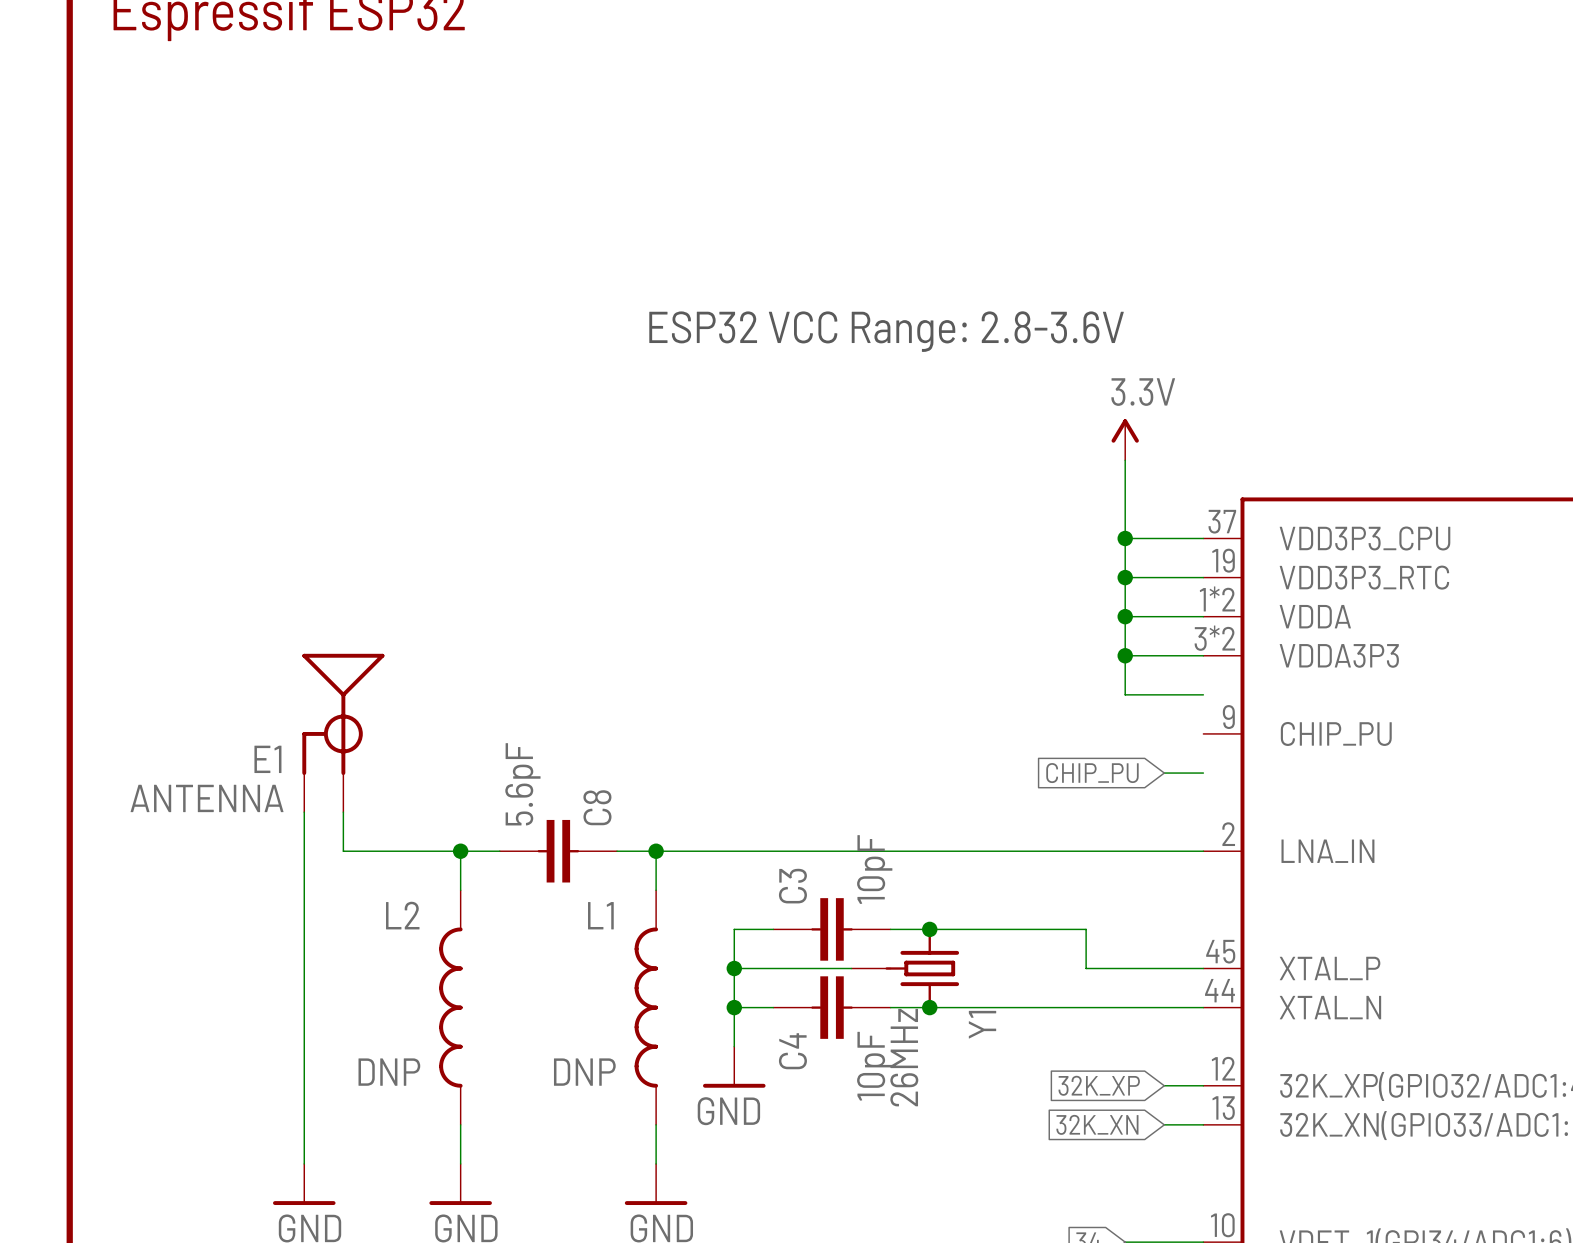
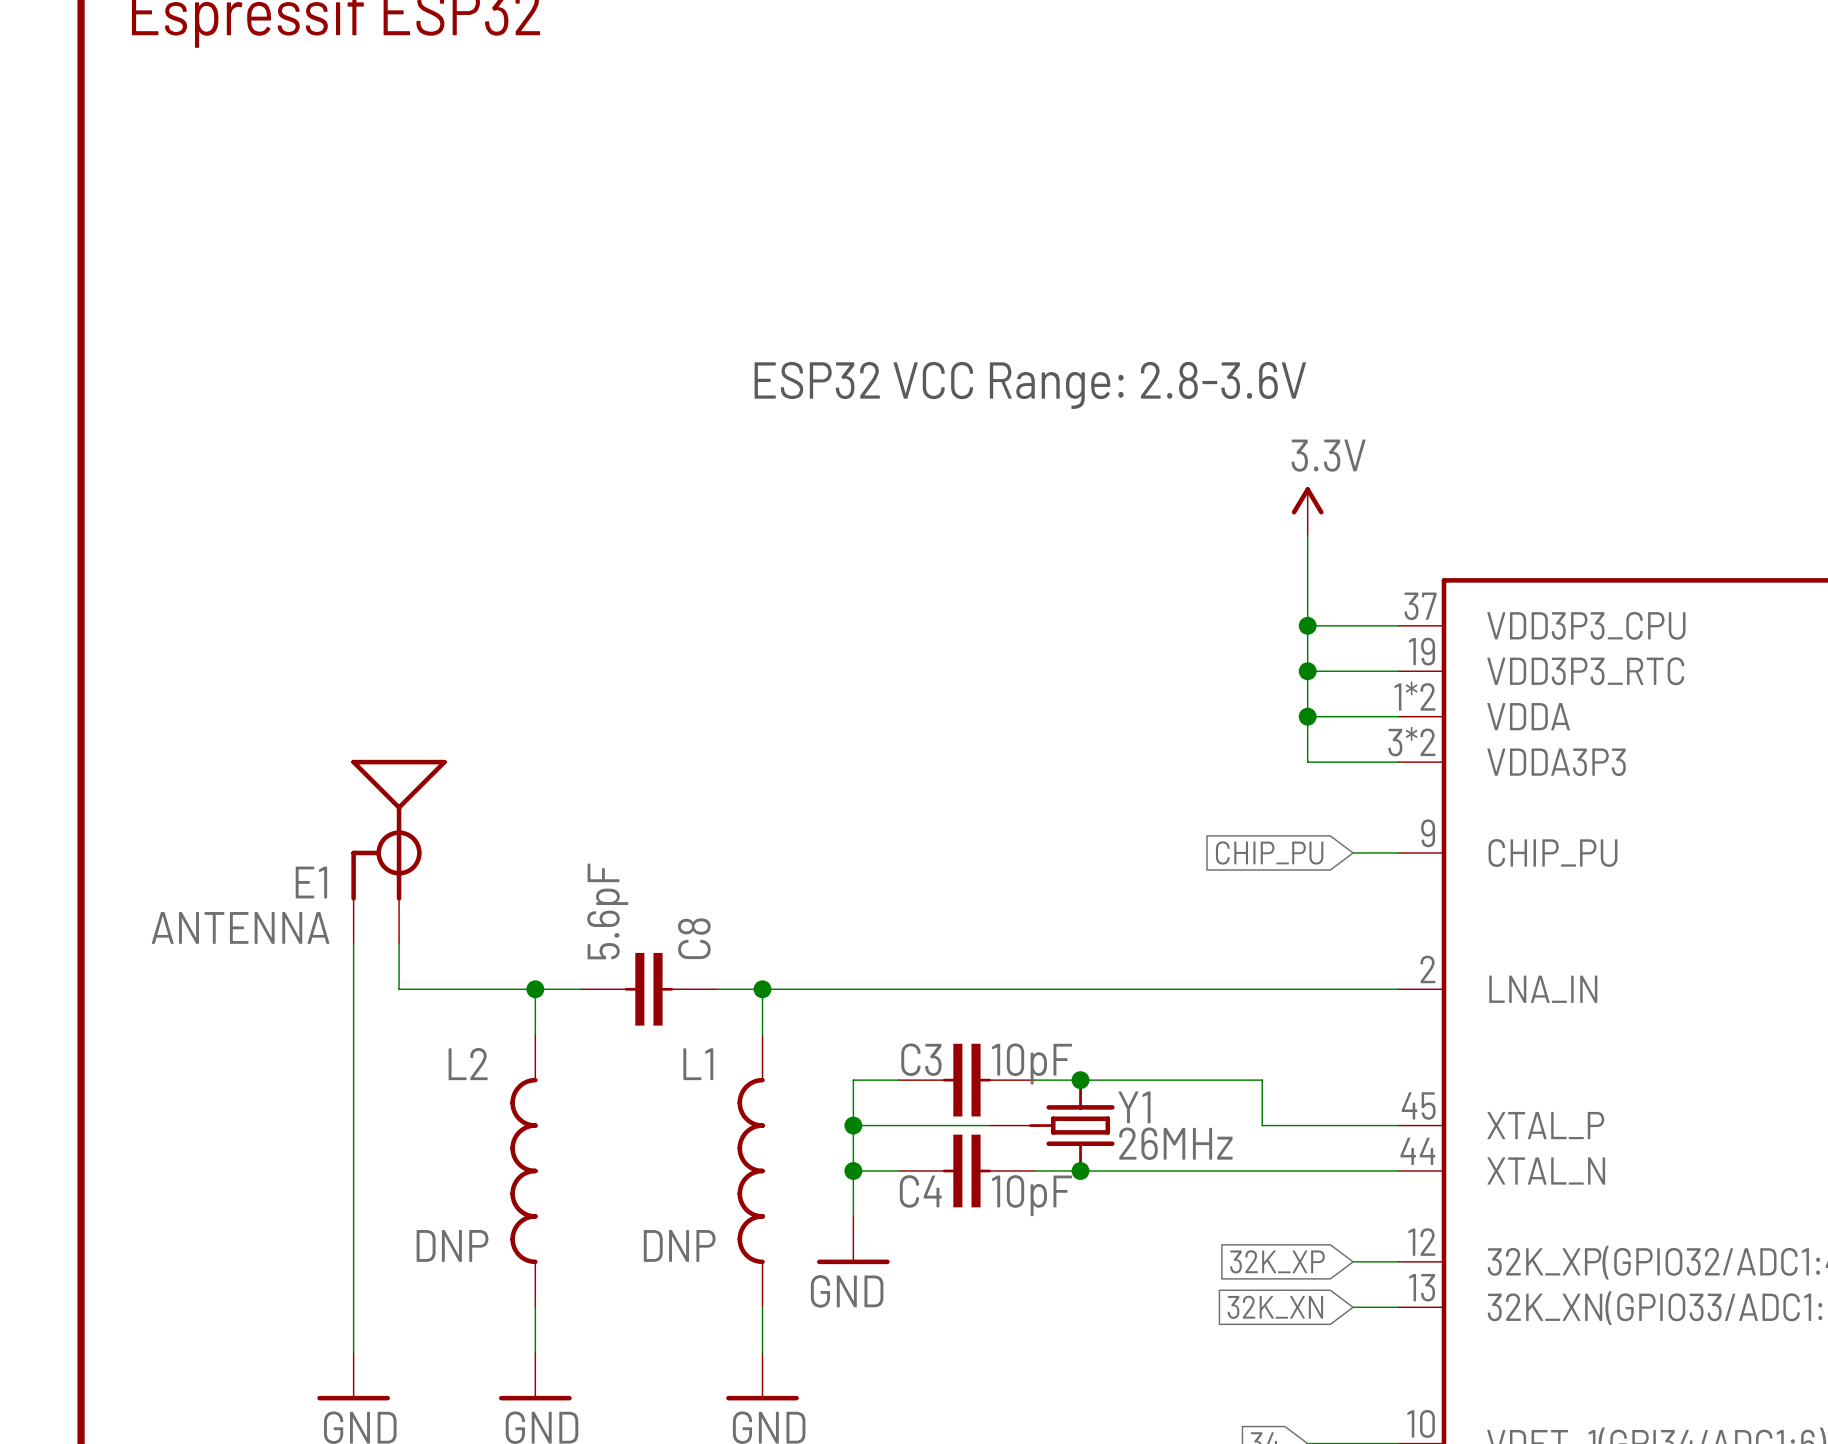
wire: (1125, 655) (1125, 694) (1203, 694) -> none
junction: (1125, 655) -> none
global label position: CHIP_PU (1092, 773) -> CHIP_PU (1269, 852)
wire: (1164, 773) (1203, 773) -> (1353, 852) (1398, 852)
C3 value rotation: 0° (874, 869) -> 90° clockwise (1032, 1063)
C3 name rotation: 0° (792, 886) -> 90° clockwise (921, 1059)
Y1 name rotation: 0° (982, 1024) -> 90° clockwise (1134, 1107)
Y1 name position: Y1 (982, 1024) -> Y1 (1134, 1107)
C4 name rotation: 0° (792, 1051) -> 90° clockwise (920, 1191)
Y1 value rotation: 0° (904, 1057) -> 90° clockwise (1175, 1143)
Y1 value position: 26MHz (904, 1057) -> 26MHz (1175, 1143)
C4 value rotation: 0° (874, 1066) -> 90° clockwise (1032, 1195)

